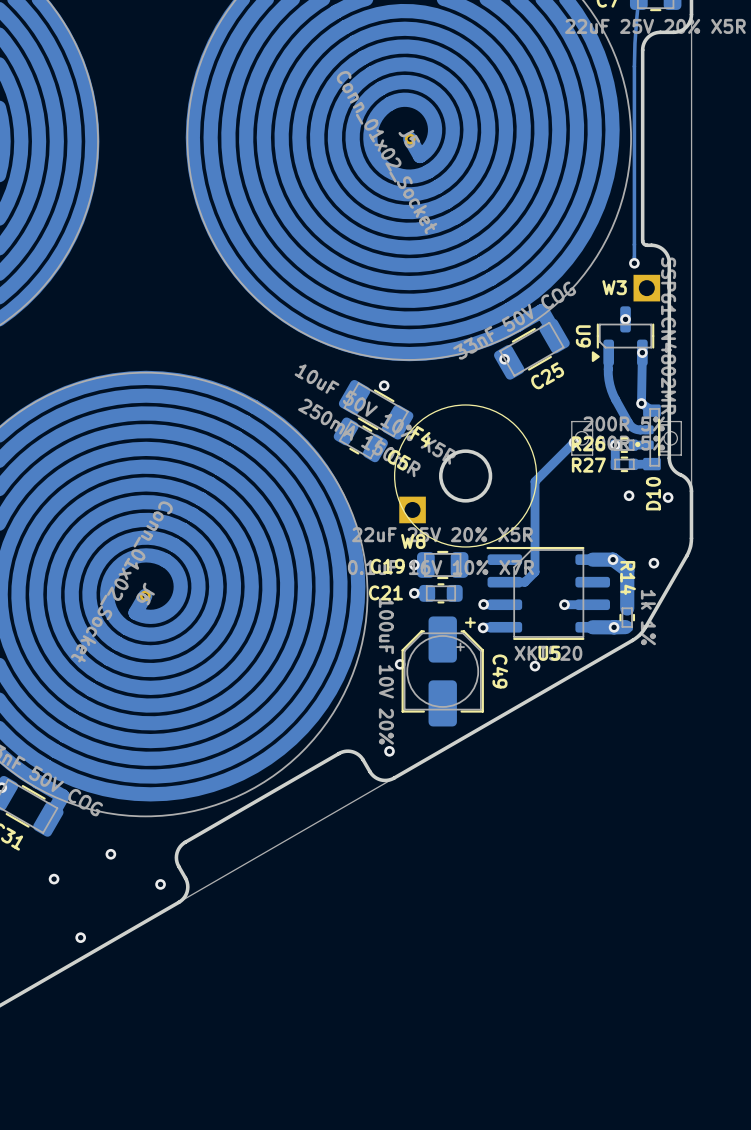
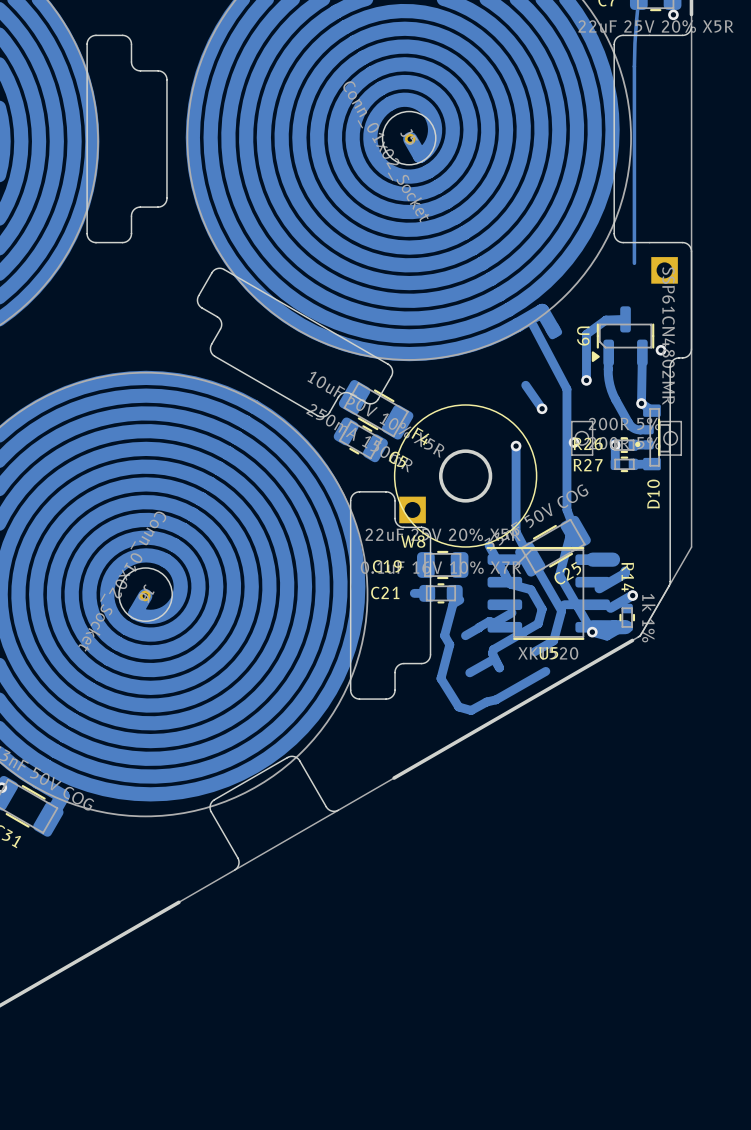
via: none -> (673, 14)
board edge: (691, 14) (689, 22) (684, 28) (677, 31) (652, 34) (645, 40) (642, 50) (642, 241) (645, 244) (655, 245) (662, 249) (669, 261) (669, 460) (673, 469) (685, 478) (690, 486) (691, 541) (686, 556) (645, 627) (632, 640) -> none
board edge: none -> (691, 26) (689, 31) (684, 35) (622, 35) (616, 38) (614, 43) (614, 236) (622, 242) (683, 242) (688, 245) (691, 251) (691, 350) (687, 356) (673, 359) (670, 365) (670, 582) (638, 637)
board edge: none -> (122, 35) (93, 35) (87, 42) (87, 233) (89, 239) (94, 242) (127, 241) (131, 235) (131, 215) (133, 209) (139, 207) (160, 206) (166, 199) (166, 77) (160, 71) (139, 70) (134, 68) (131, 63) (130, 40) (122, 35)
round board edge: none -> [382, 111, 437, 166]
via: (634, 263) -> none
board edge: none -> (224, 269) (389, 364) (392, 374) (377, 400) (368, 403) (349, 393) (343, 392) (339, 396) (328, 414) (319, 416) (213, 355) (210, 346) (220, 328) (221, 322) (218, 317) (200, 306) (197, 299) (213, 271) (218, 268) (224, 269)
part: none -> (664, 270)
W3: (646, 288) -> none
track: none -> (625, 319) (606, 320) (586, 334) (586, 380)
via: (625, 319) -> none
track: none -> (533, 325) (566, 389) (566, 509) (575, 533) (569, 536) (559, 575) (592, 632) (607, 636) (621, 627)
C25 position: (531, 349) -> (553, 546)
via position: (642, 352) -> (661, 350)
via: (504, 359) -> none
via: none -> (586, 380)
via: (384, 385) -> none
track: none -> (525, 385) (542, 408)
via: none -> (542, 408)
track: (574, 442) (535, 481) (535, 572) (524, 582) (504, 582) -> none
track: none -> (516, 446) (516, 532) (561, 610) (553, 640) (534, 651)
via: none -> (516, 446)
board edge: none -> (386, 491) (357, 492) (350, 499) (350, 690) (352, 695) (358, 698) (390, 697) (394, 692) (395, 671) (397, 666) (402, 663) (423, 663) (430, 655) (430, 534) (424, 527) (402, 527) (397, 524) (395, 519) (394, 497) (391, 493) (386, 491)
via: (629, 495) -> none
via: (668, 497) -> none
track: none -> (489, 545) (510, 584) (530, 589) (542, 609) (538, 623) (493, 649) (492, 653) (499, 667) (494, 659) (469, 672)
track: (613, 559) (627, 570) (627, 608) -> none
via: (613, 559) -> none
via: (653, 563) -> none
via: (414, 564) -> none
round board edge: none -> [118, 567, 173, 622]
track: none -> (625, 571) (624, 573) (599, 588)
via: (414, 593) -> none
track: none -> (632, 595) (610, 607)
via: none -> (632, 595)
track: none -> (459, 600) (453, 603) (444, 635) (449, 644) (440, 678) (458, 706) (471, 710) (486, 702) (495, 699) (545, 671)
via: (483, 604) -> none
via: (564, 604) -> none
track: none -> (512, 612) (494, 622) (489, 621) (465, 635)
via: (483, 627) -> none
via: (614, 627) -> none
via: none -> (592, 632)
via: (400, 664) -> none
via: (535, 666) -> none
C49: 100uF 10V 20% (442, 671) -> none
via: (389, 751) -> none
board edge: (394, 778) (386, 780) (376, 778) (370, 773) (359, 755) (352, 751) (342, 751) (185, 842) (180, 846) (176, 855) (177, 864) (186, 880) (187, 887) (185, 895) (178, 902) -> none
board edge: none -> (338, 810) (332, 811) (327, 808) (299, 759) (293, 756) (287, 757) (214, 799) (210, 804) (210, 811) (238, 860) (238, 865) (234, 870)
via: (110, 854) -> none
via: (54, 879) -> none
via: (160, 884) -> none
via: (80, 937) -> none

